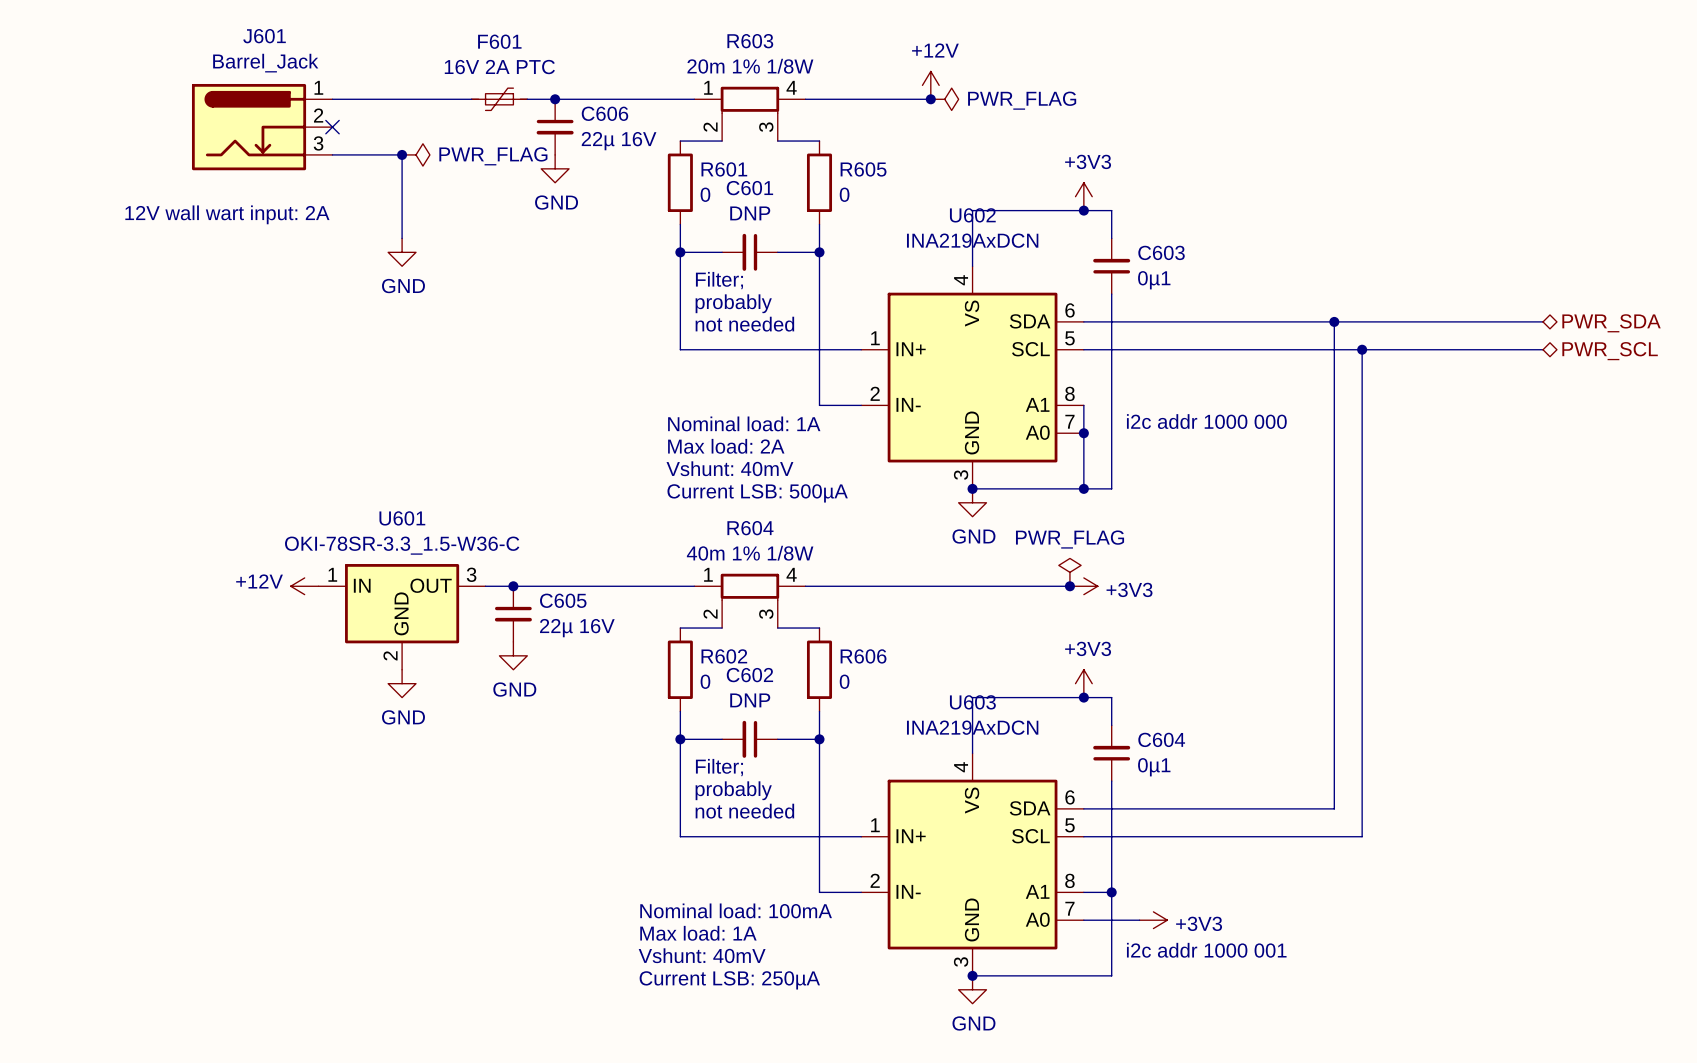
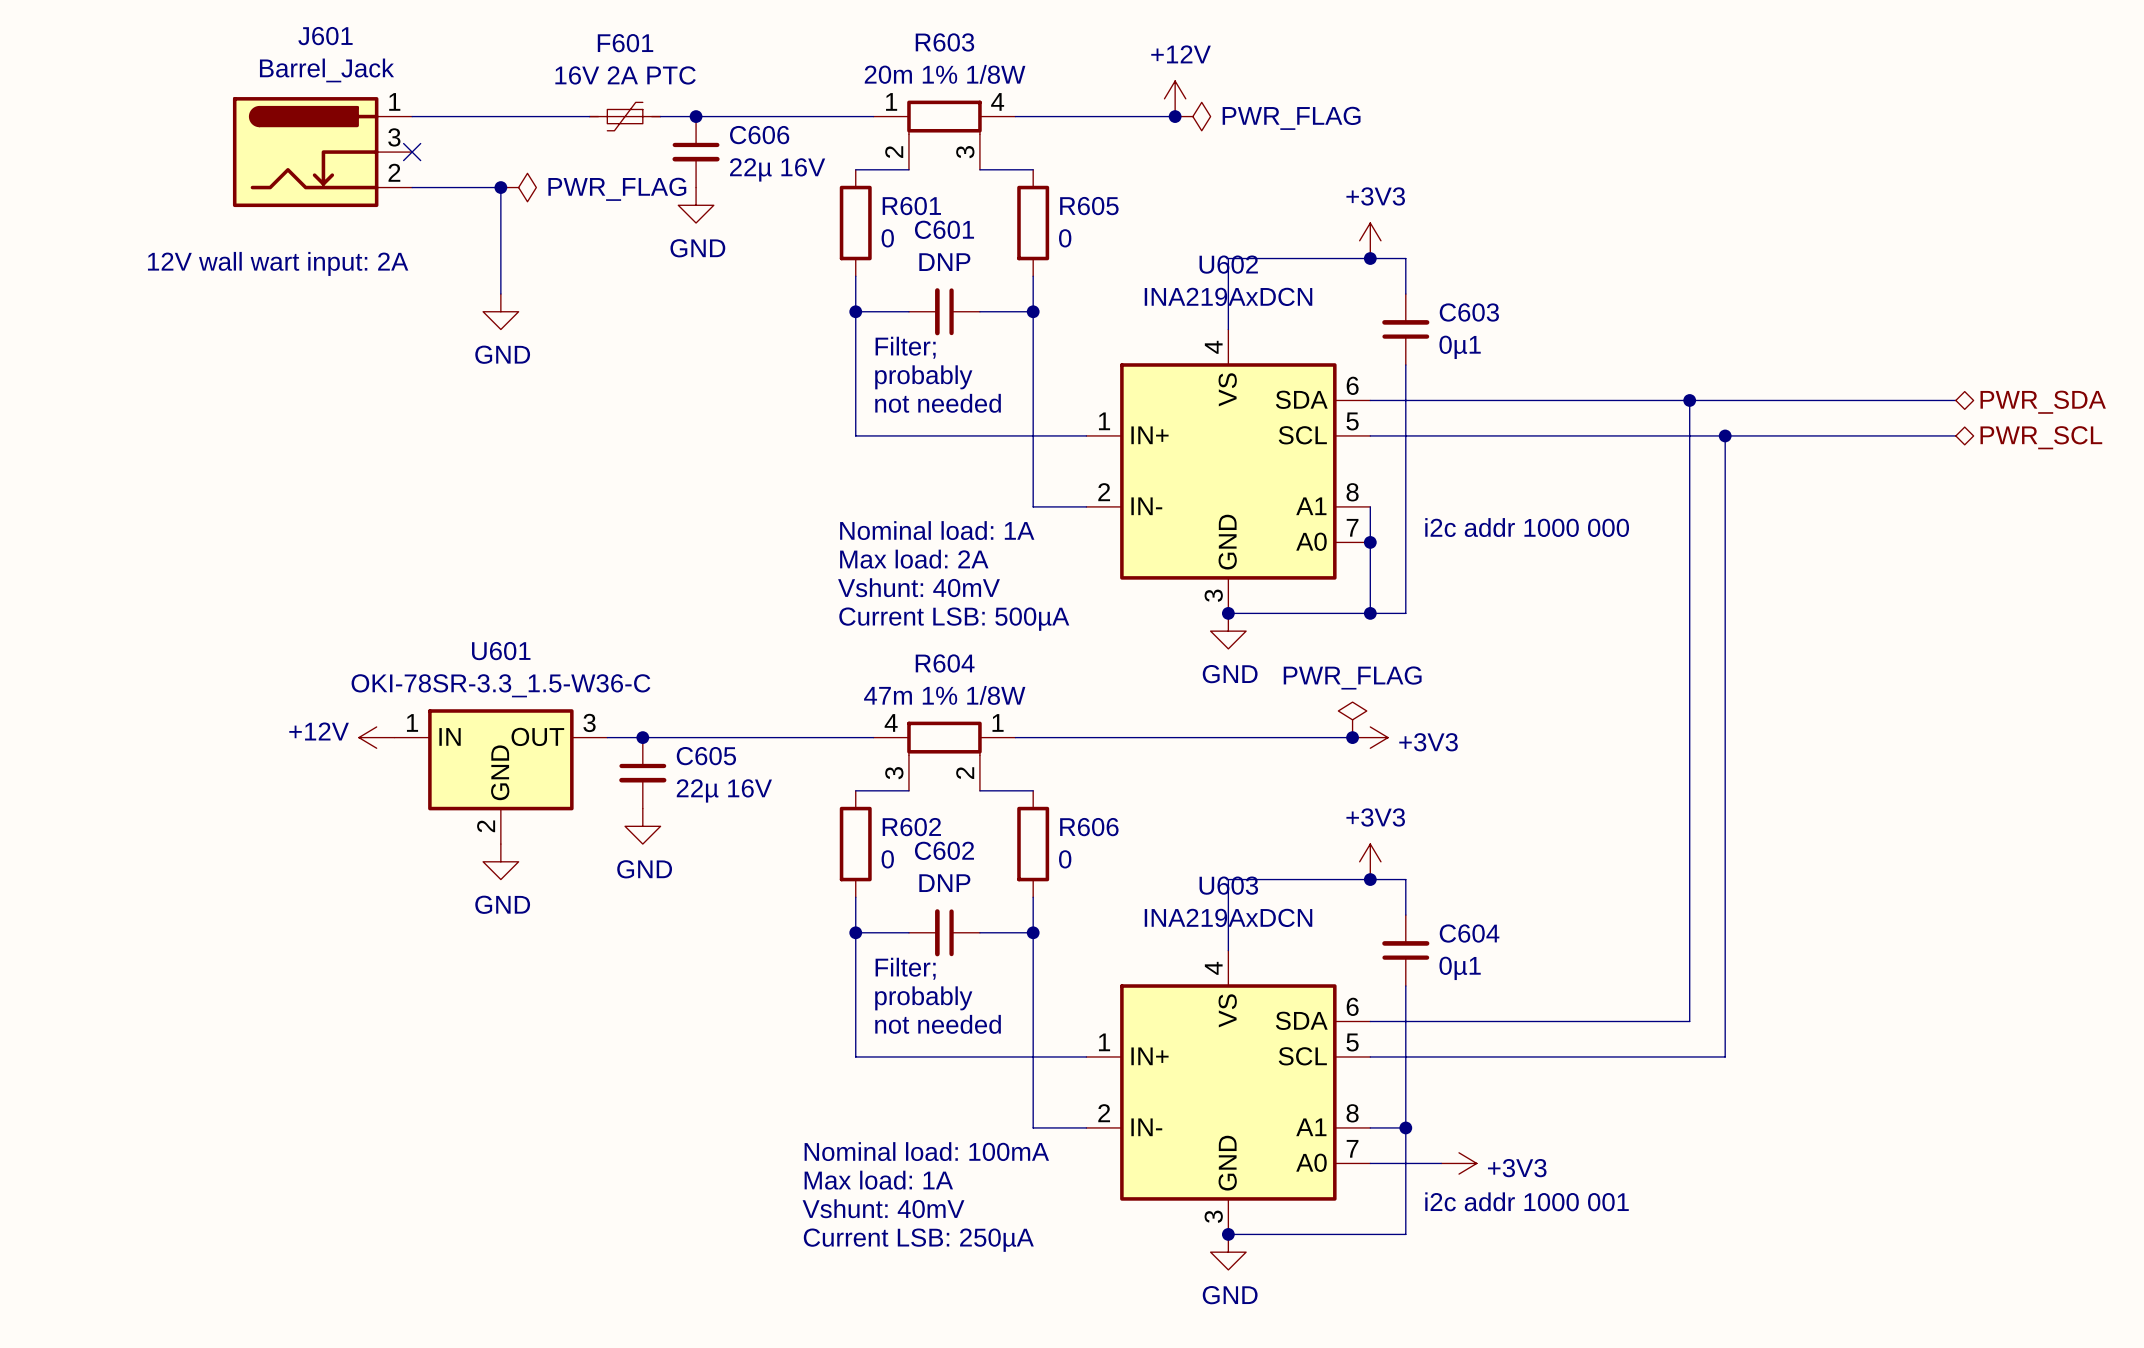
J601 pin number: 2 (318, 115) -> 3 (394, 137)
J601 pin number: 3 (318, 143) -> 2 (394, 172)
R604 value: 40m 1% 1/8W (750, 553) -> 47m 1% 1/8W (944, 695)
R604 flip: as is (749, 586) -> left-right (944, 738)

